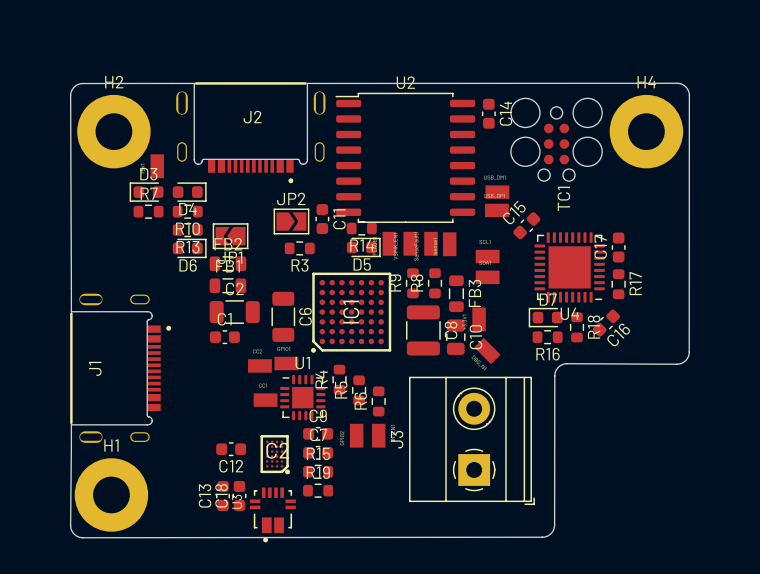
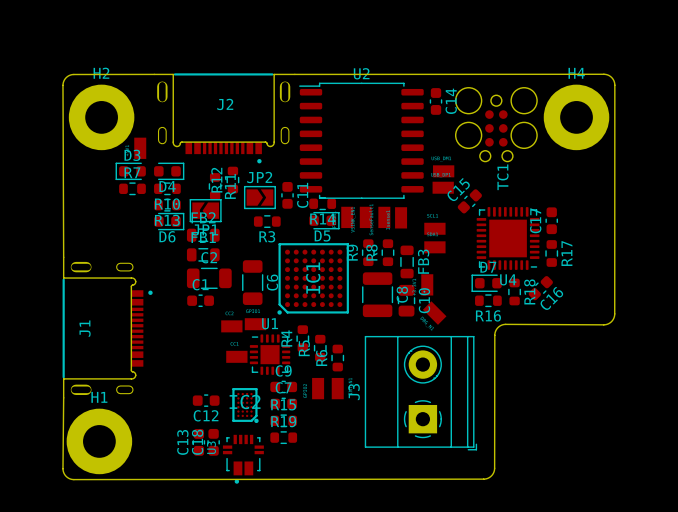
R12: none -> (232, 180)
R11: none -> (215, 186)

